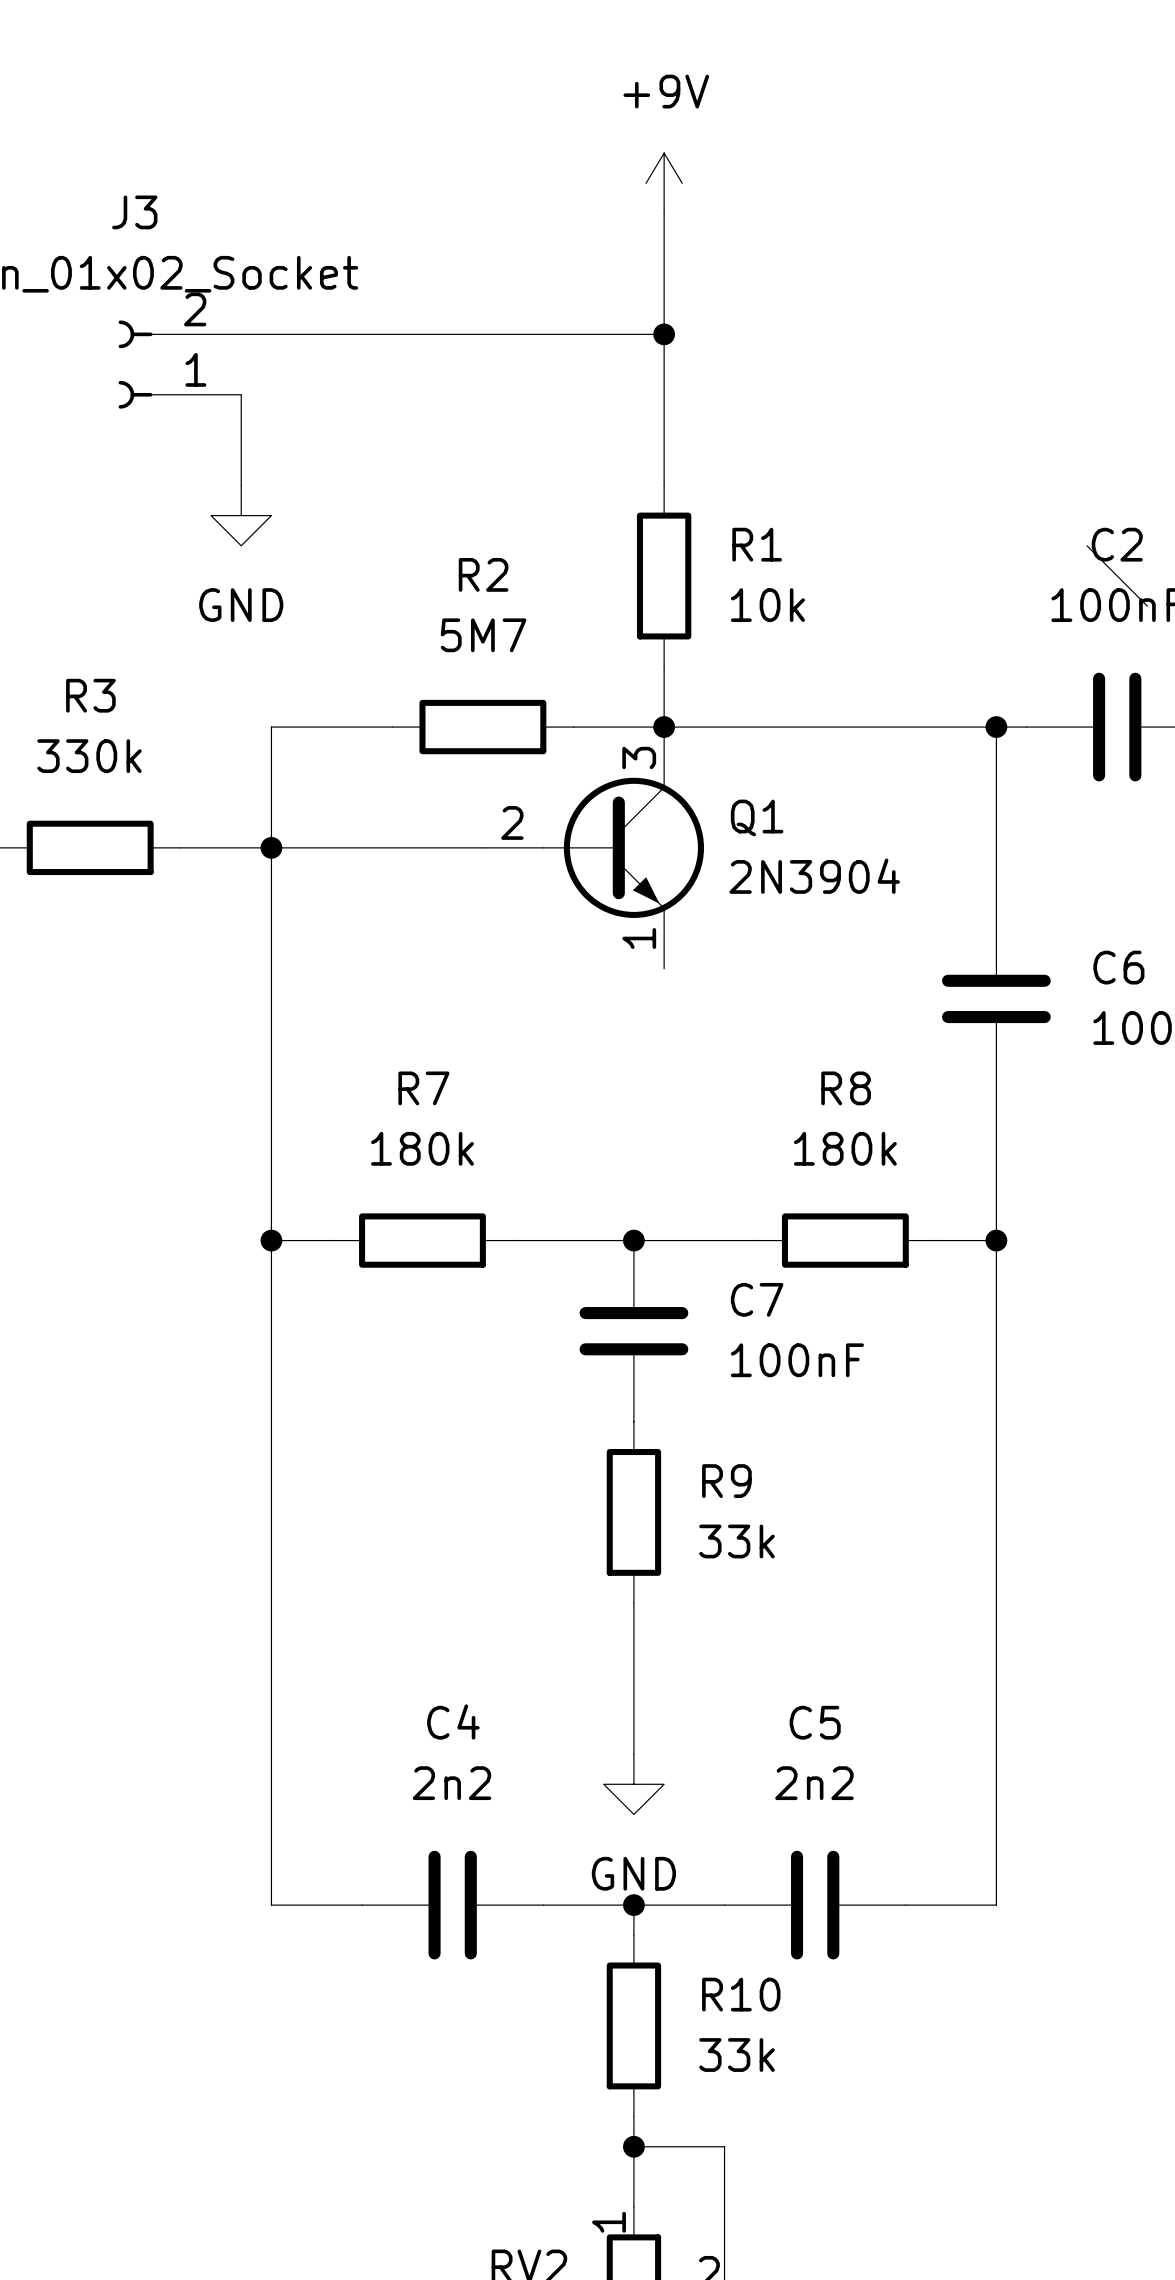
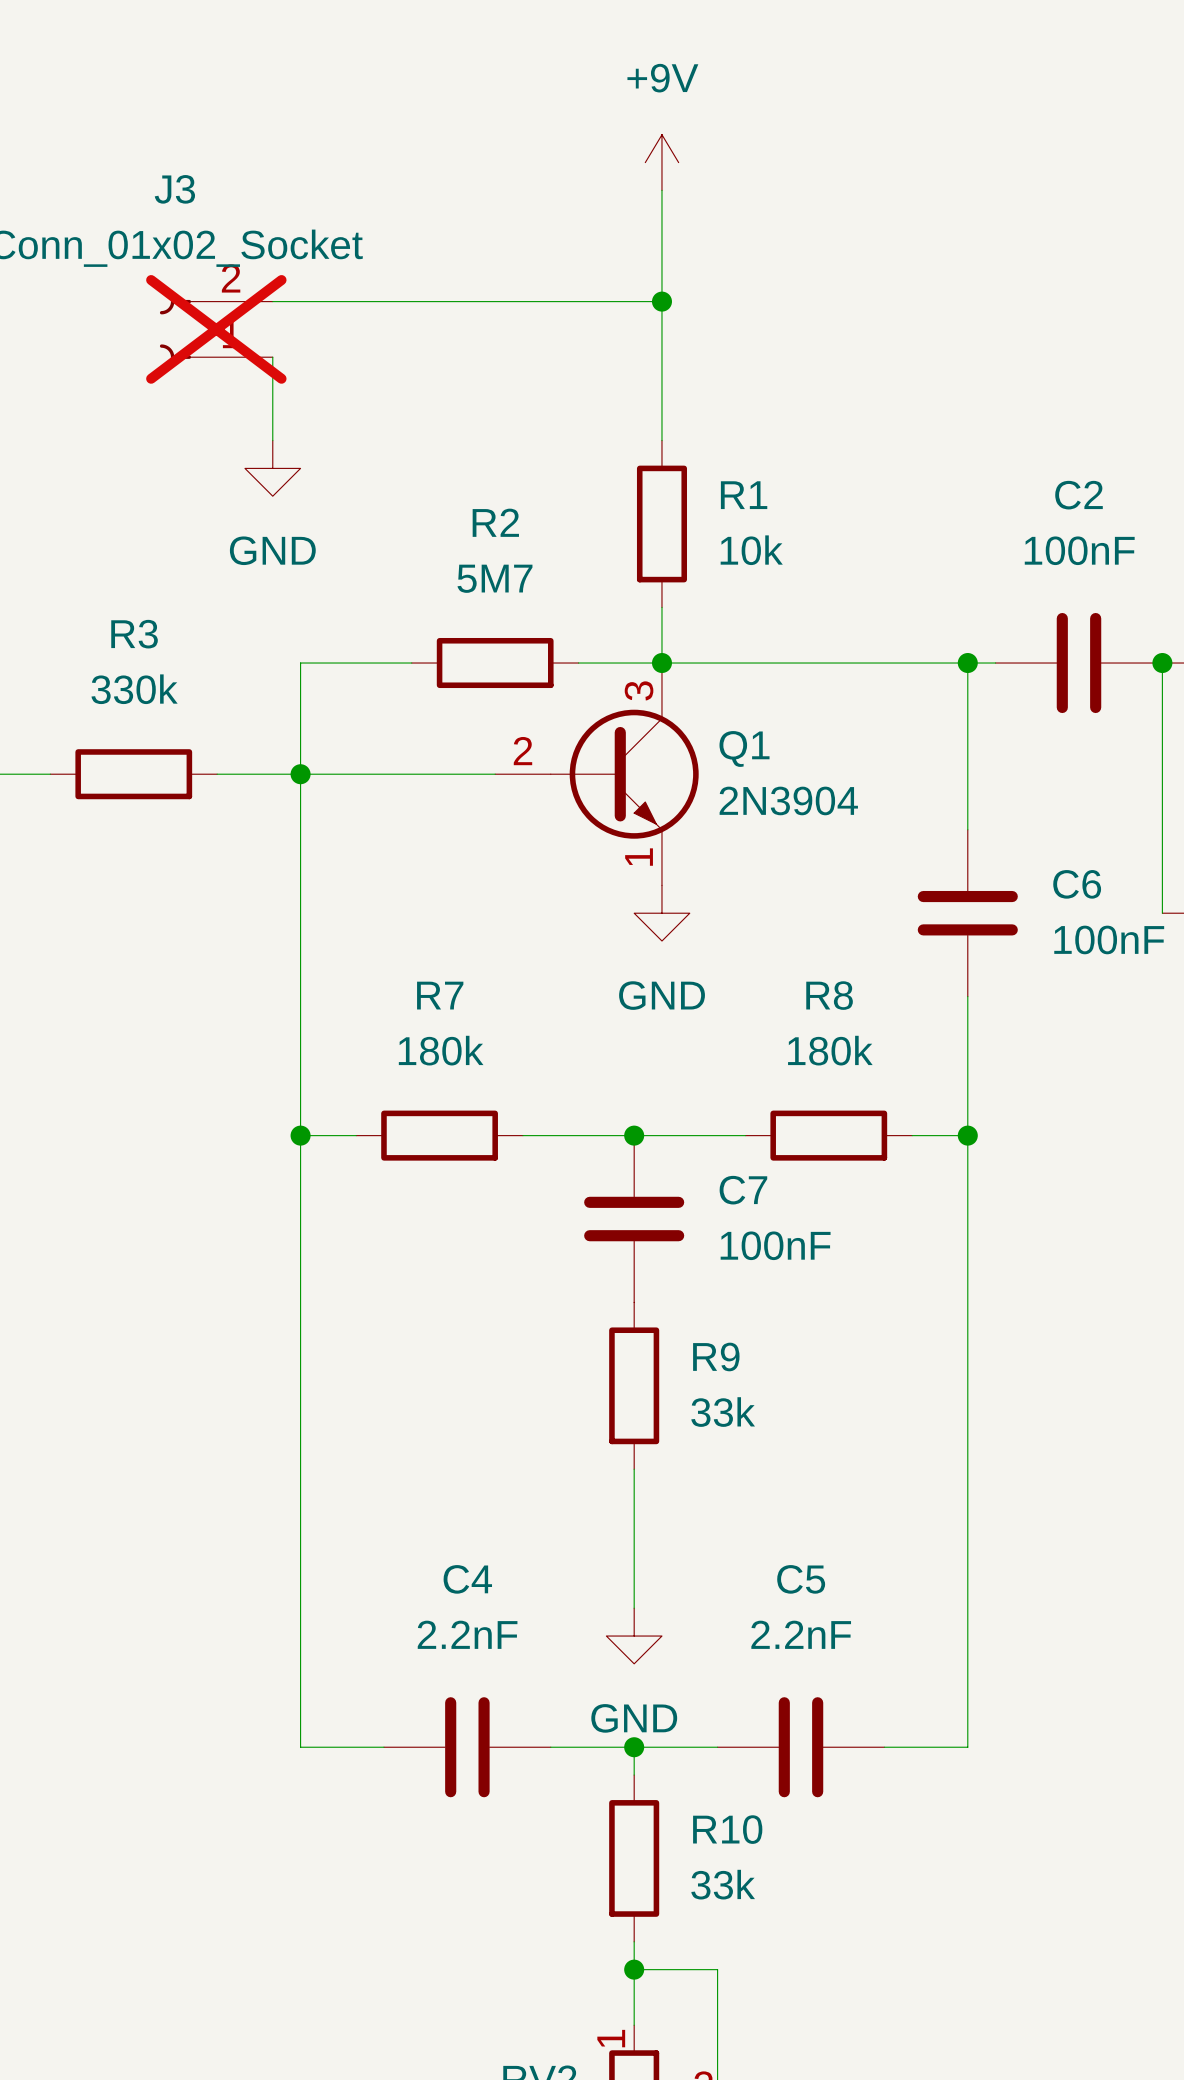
J3 do-not-place cross: none -> (216, 329)
wire: (1087, 545) (1147, 606) -> none
power symbol: none -> GND (661, 913)
C4 value: 2n2 (451, 1783) -> 2.2nF (467, 1634)
C5 value: 2n2 (814, 1783) -> 2.2nF (801, 1634)

